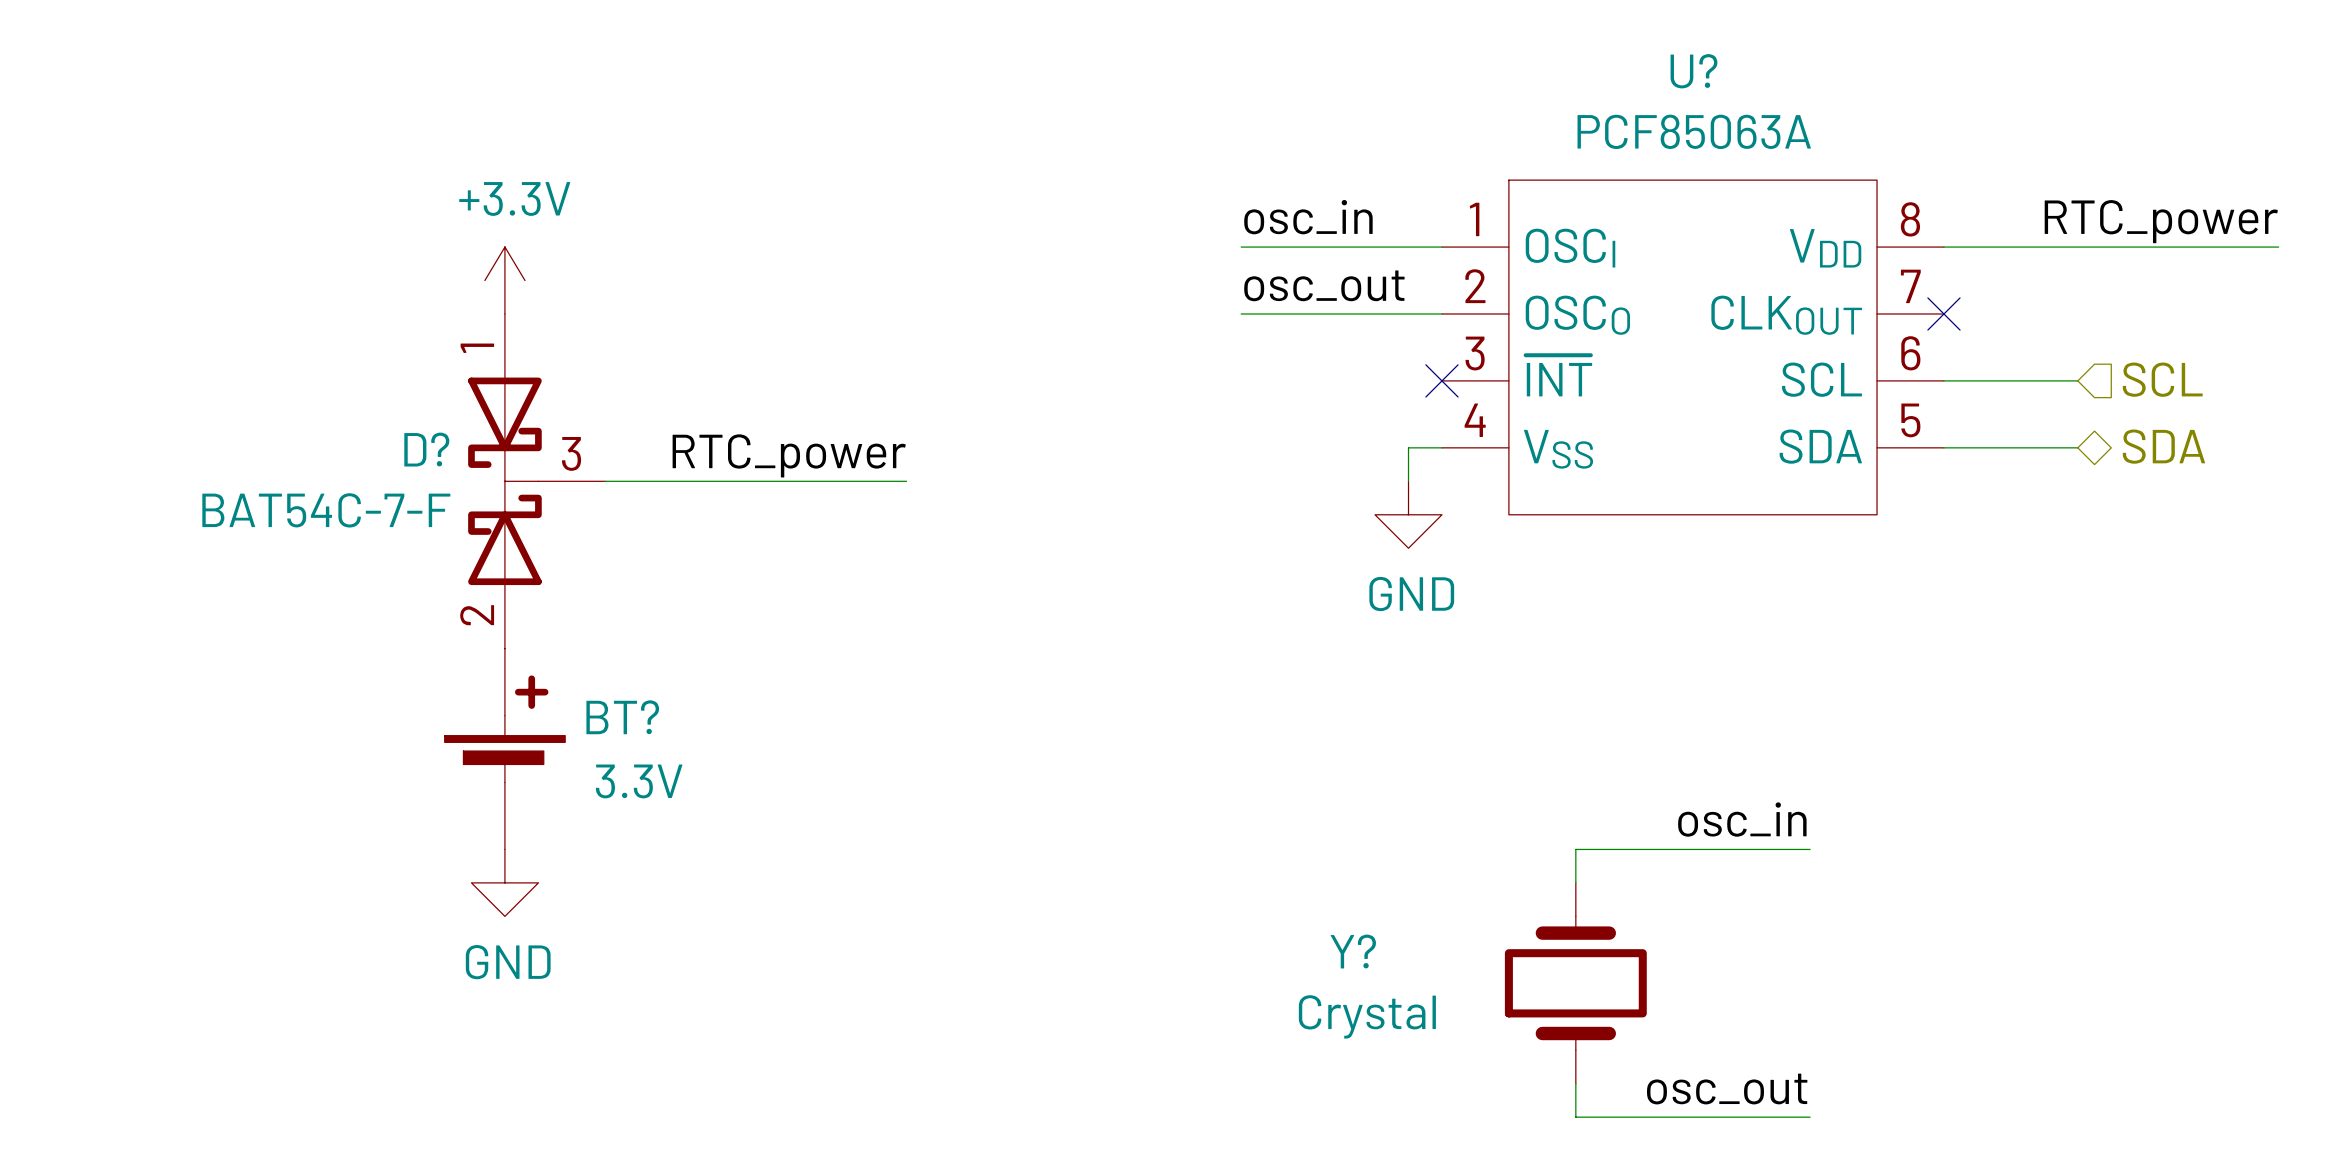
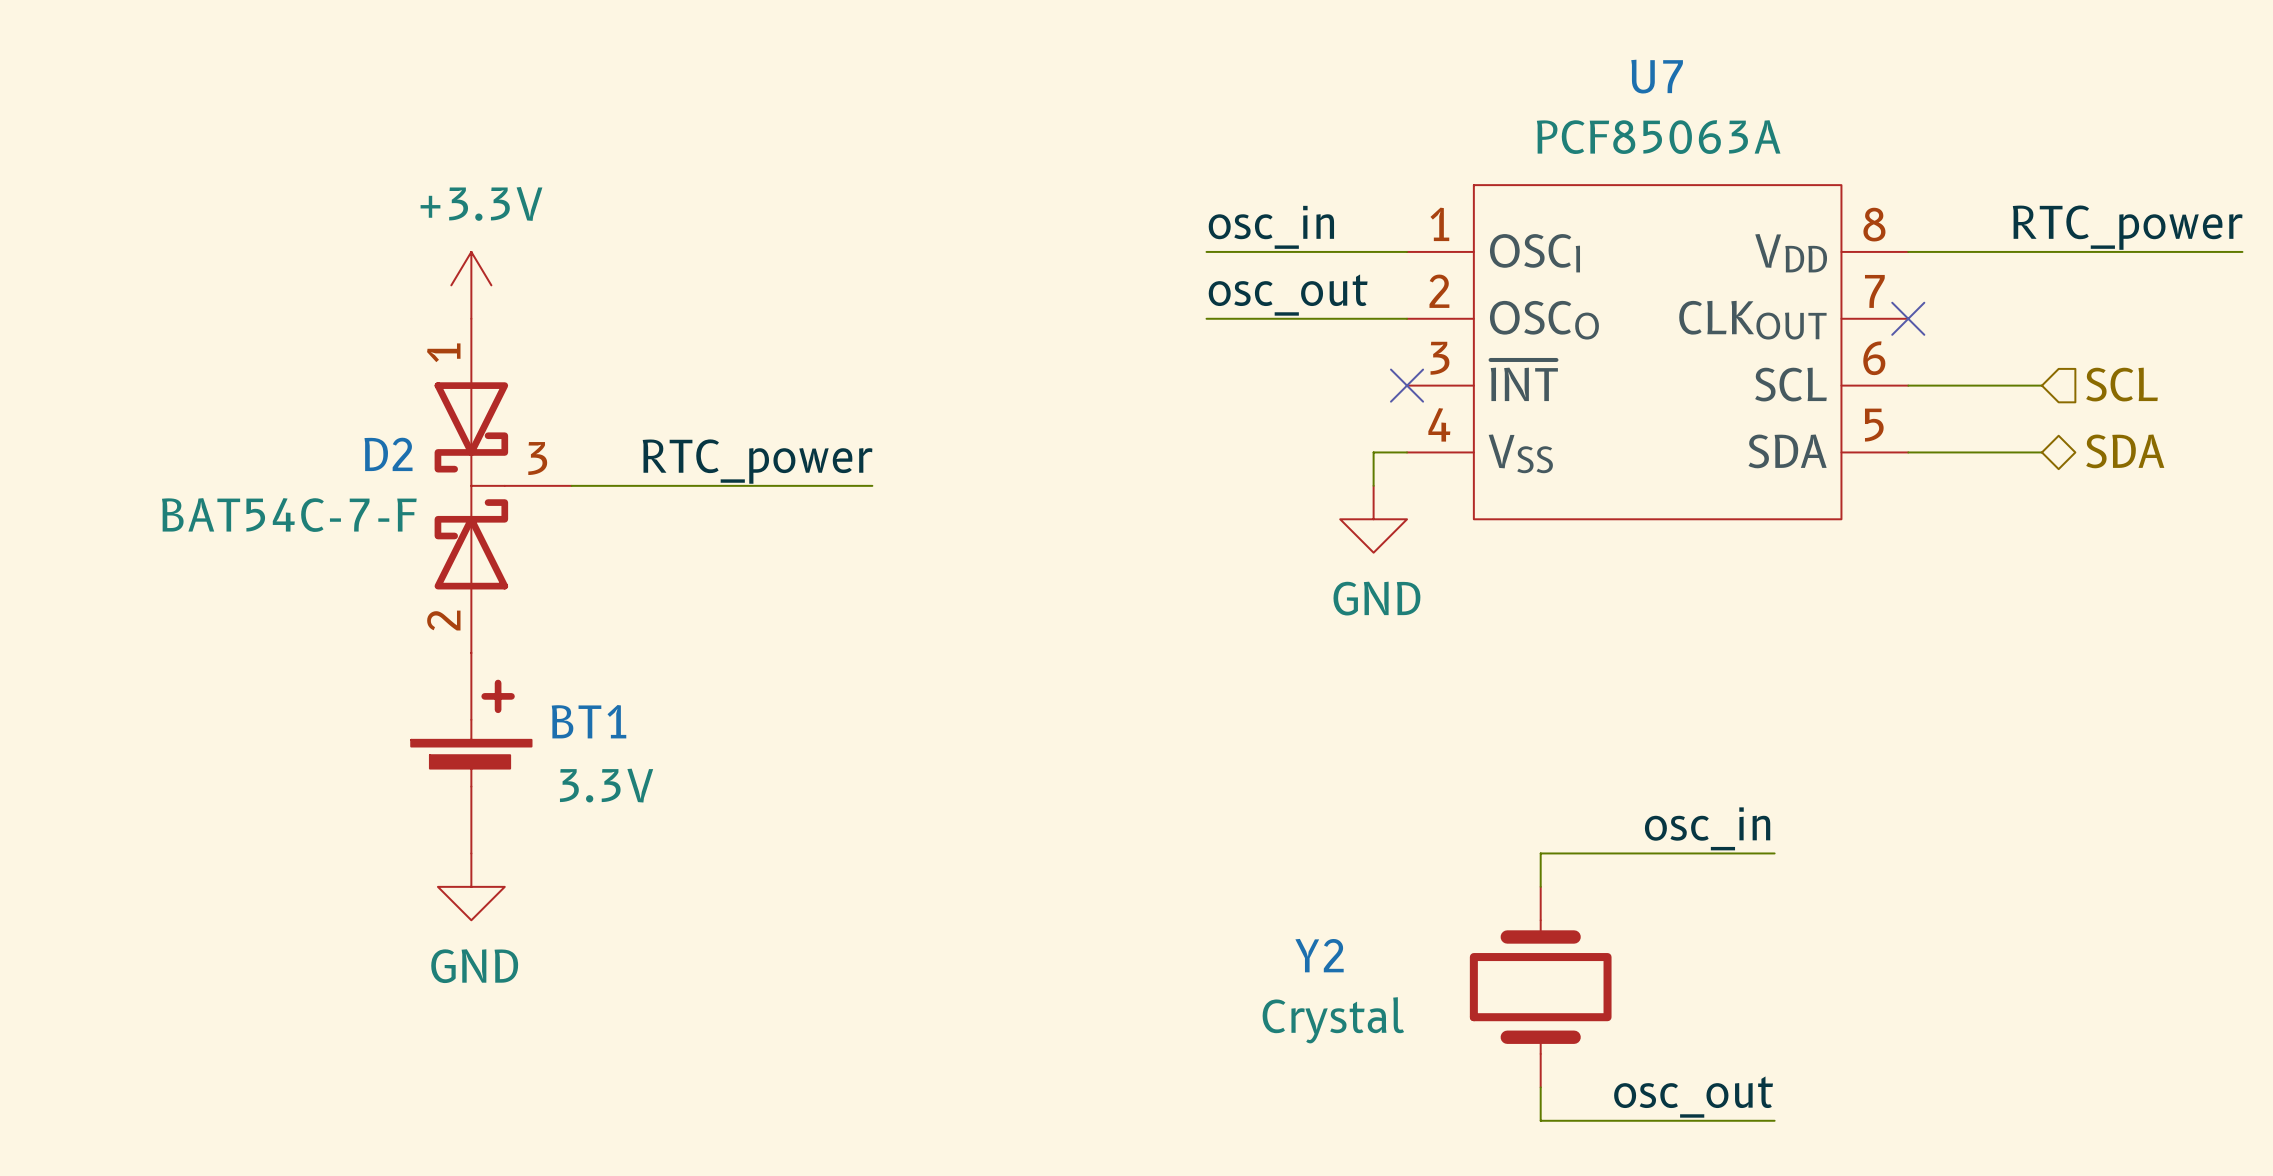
U? name: U? (1693, 71) -> U7 (1657, 76)
D? name: D? (426, 449) -> D2 (388, 454)
BT? name: BT? (622, 717) -> BT1 (589, 721)
Y? name: Y? (1353, 951) -> Y2 (1319, 955)

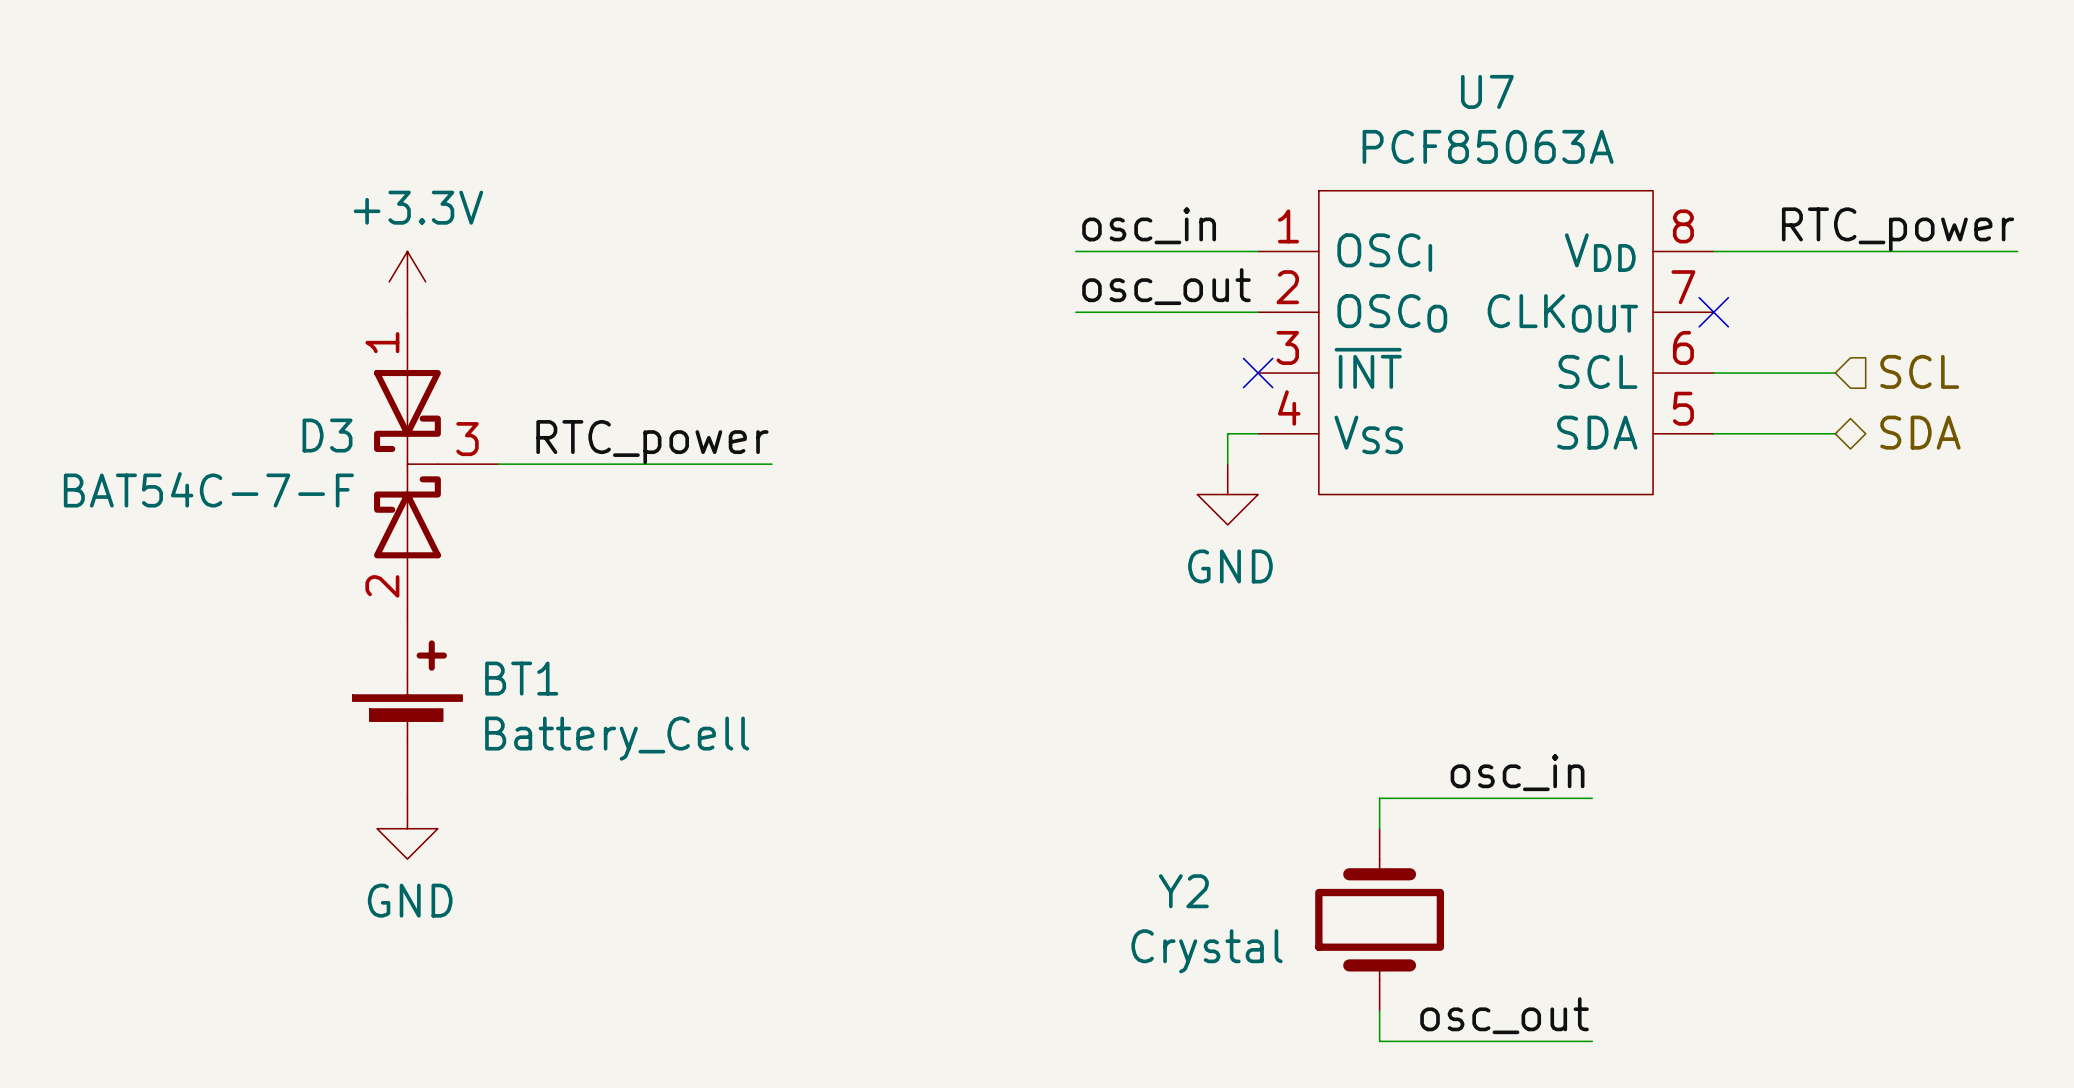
D2 name: D2 (388, 454) -> D3 (327, 435)
BT1 text: 3.3V (606, 785) -> none
BT1 value: none -> Battery_Cell (617, 738)

